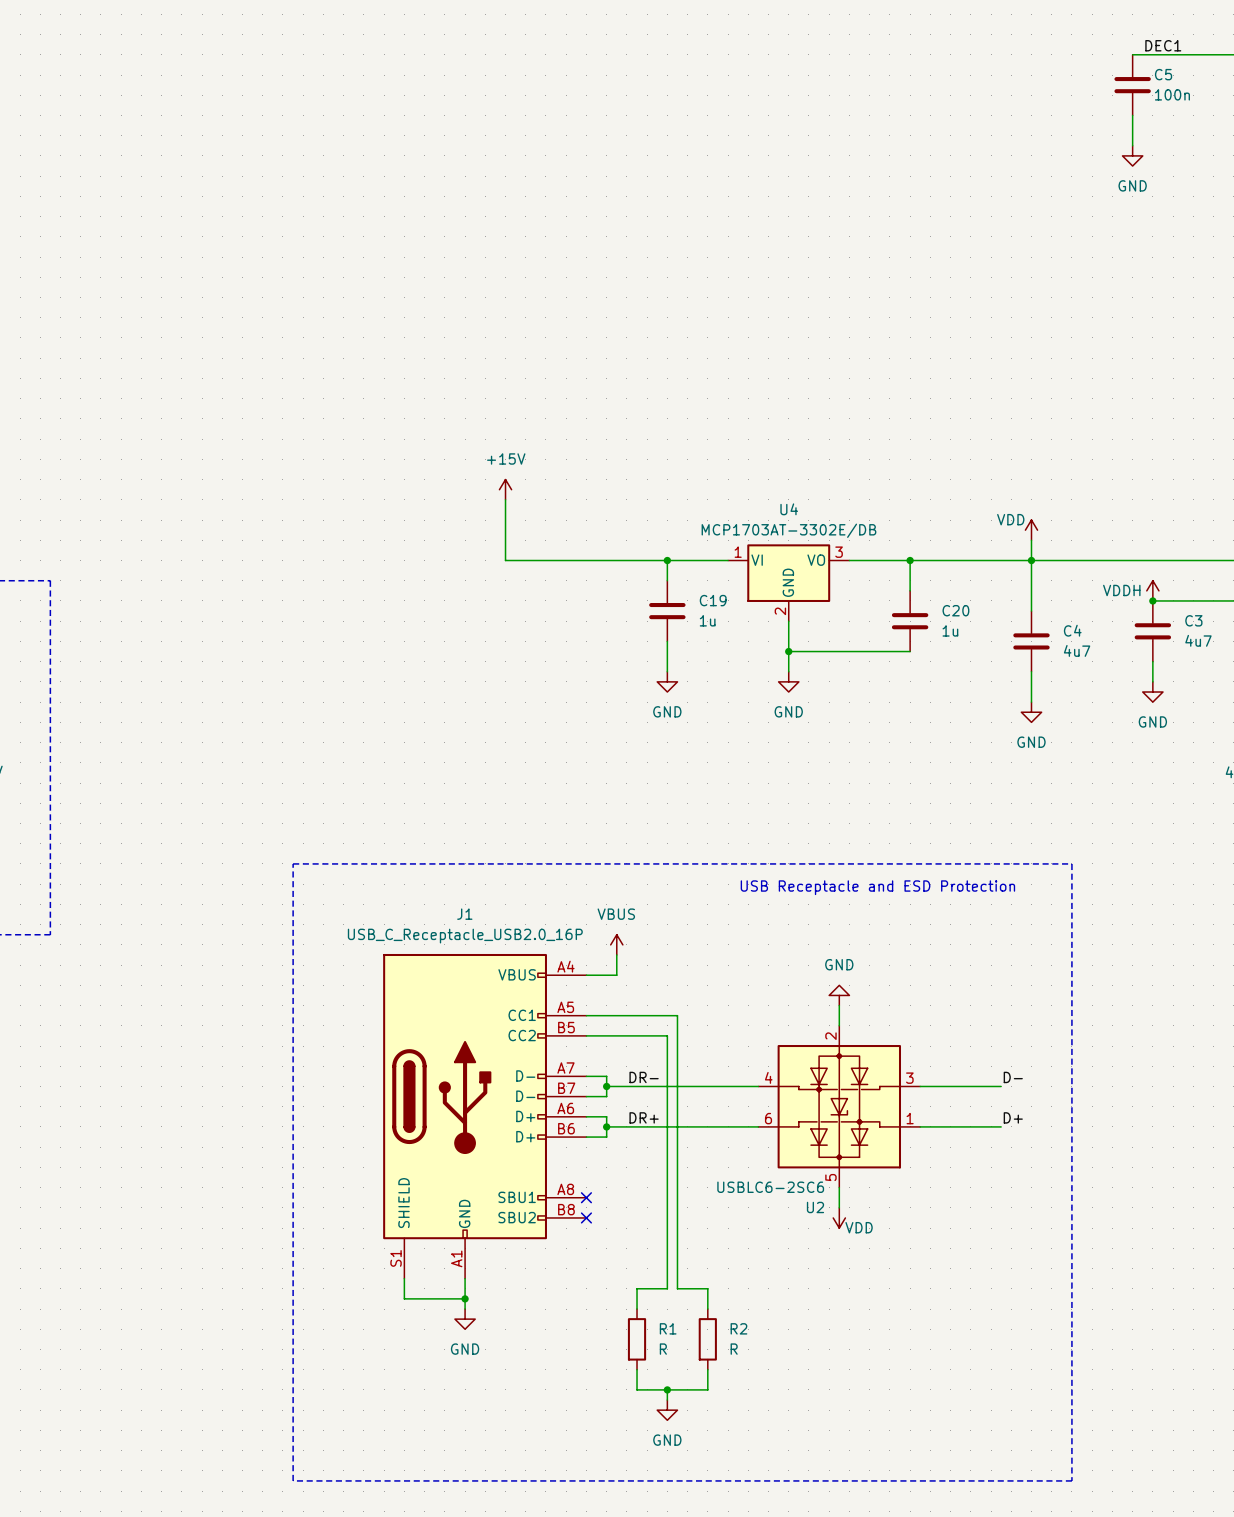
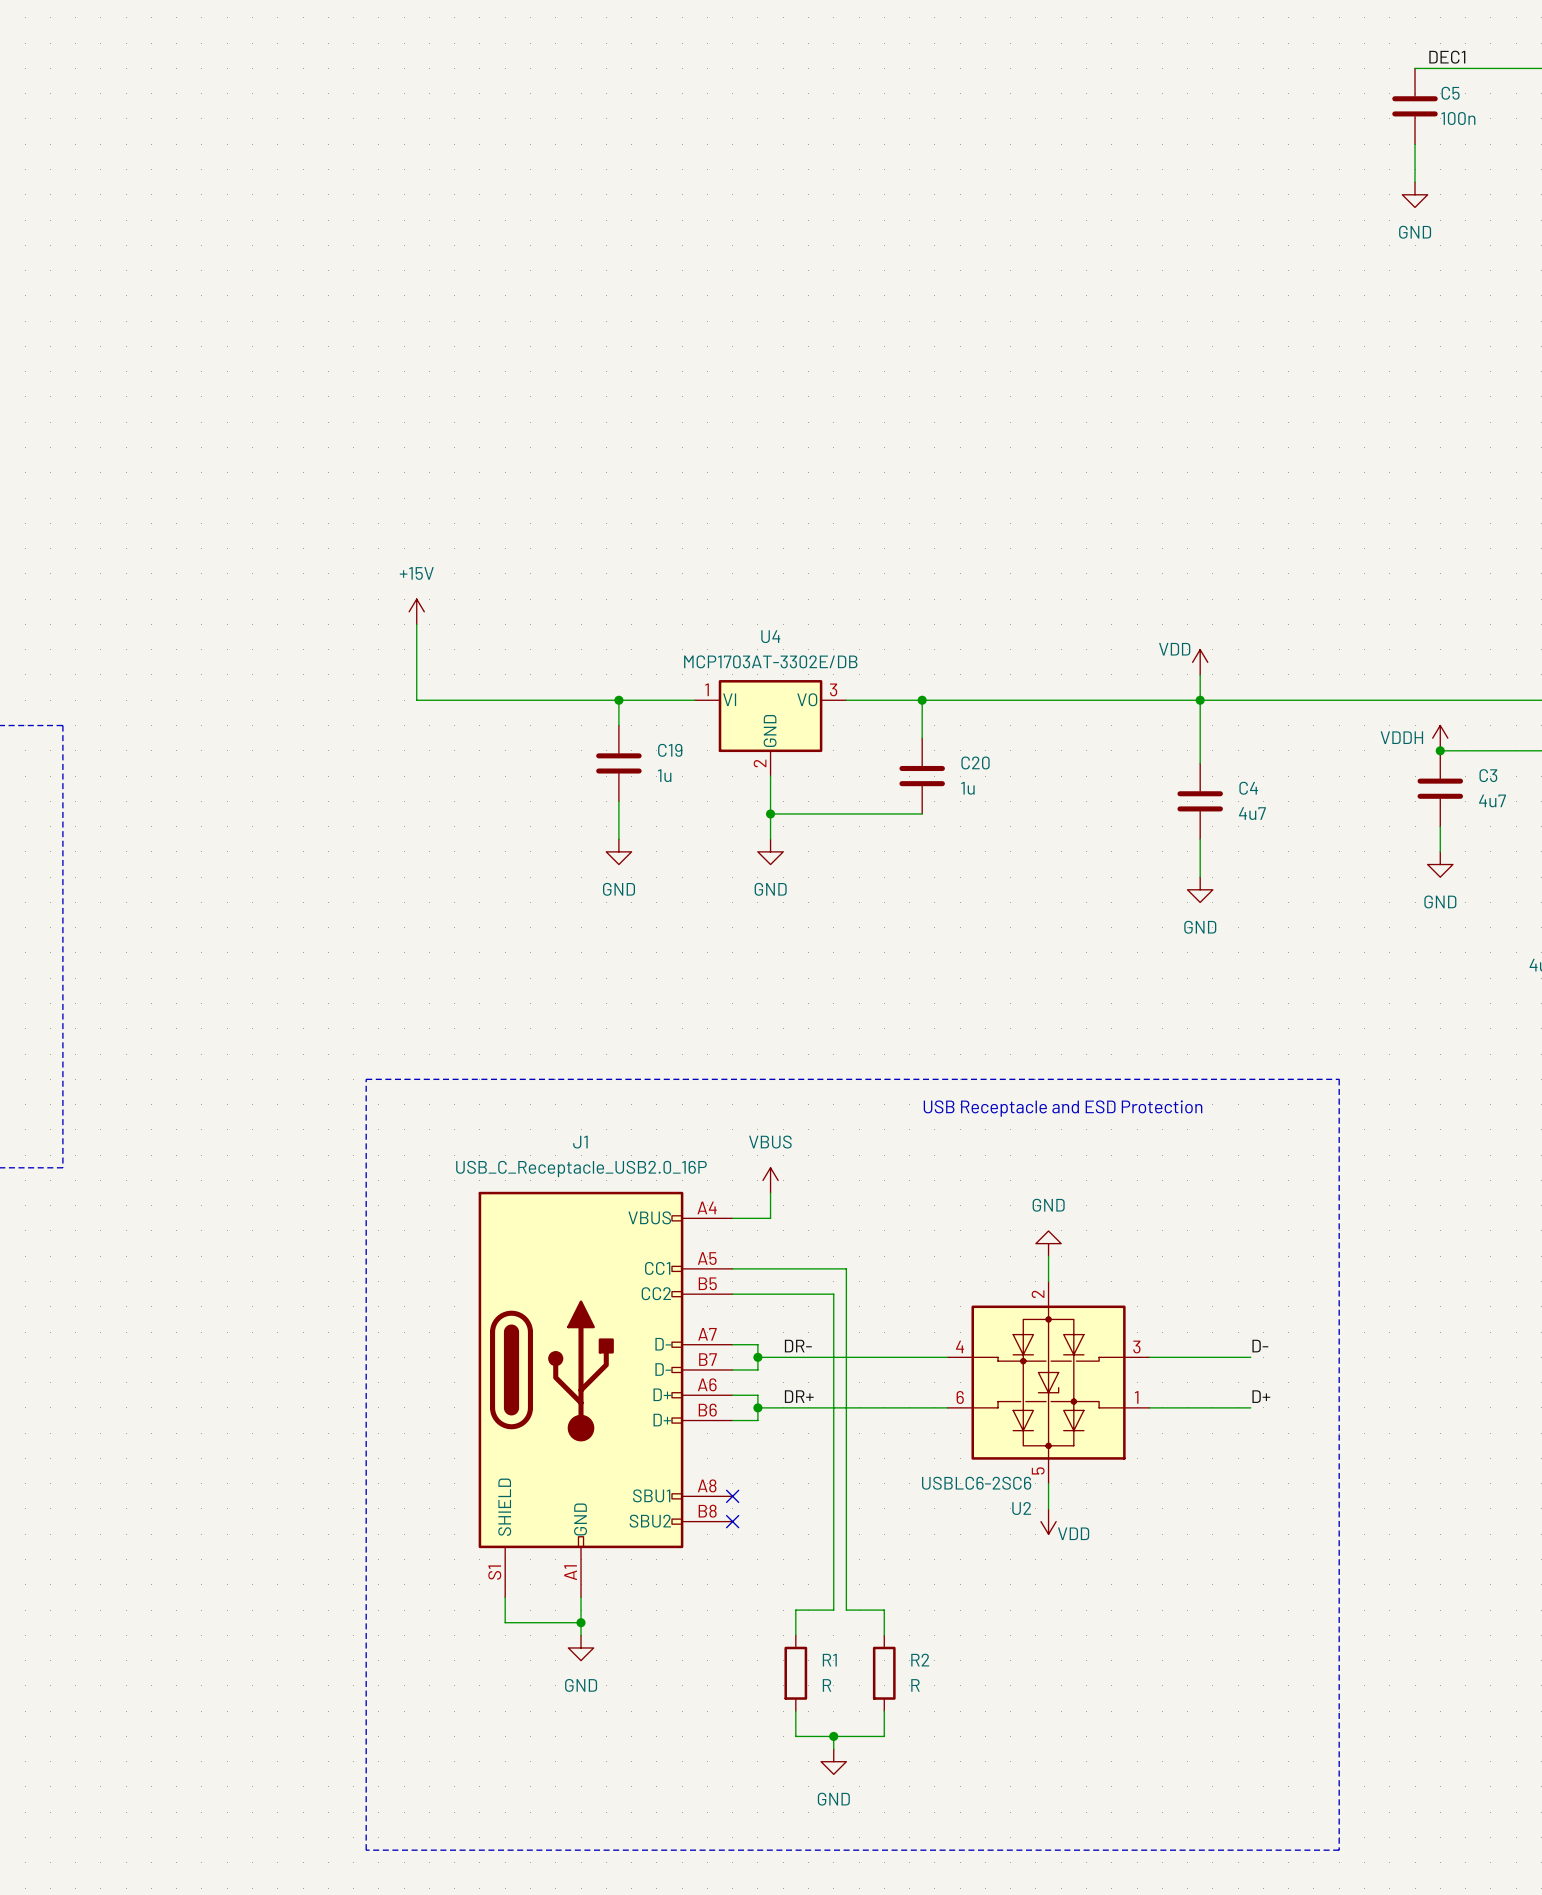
power symbol position: +15V (505, 489) -> +15V (416, 611)
wire: (505, 499) (505, 560) -> (416, 624) (416, 700) (631, 700)
power symbol position: VDD (1031, 530) -> VDD (1200, 662)
wire: (1031, 540) (1031, 611) -> (1200, 674) (1200, 763)
junction: none -> (618, 700)
wire: (667, 560) (667, 580) -> (618, 700) (618, 725)
junction: (667, 560) -> none
junction: none -> (922, 700)
wire: (910, 560) (910, 590) -> (922, 700) (922, 738)
junction: (910, 560) -> none
junction: none -> (1200, 700)
junction: (1031, 560) -> none
U4 position: (788, 582) -> (770, 728)
C19 position: (667, 611) -> (618, 763)
wire: (788, 621) (788, 671) -> (770, 776) (770, 839)
C20 position: (910, 621) -> (922, 776)
wire: (667, 641) (667, 671) -> (618, 801) (618, 839)
C4 position: (1031, 641) -> (1200, 801)
junction: none -> (770, 813)
wire: (788, 651) (910, 651) -> (770, 813) (922, 813)
junction: (788, 651) -> none
wire: (1031, 671) (1031, 702) -> (1200, 839) (1200, 877)
power symbol: none -> GND (618, 851)
power symbol position: GND (667, 681) -> GND (770, 851)
power symbol: GND (788, 681) -> none
power symbol position: GND (1031, 712) -> GND (1200, 889)

